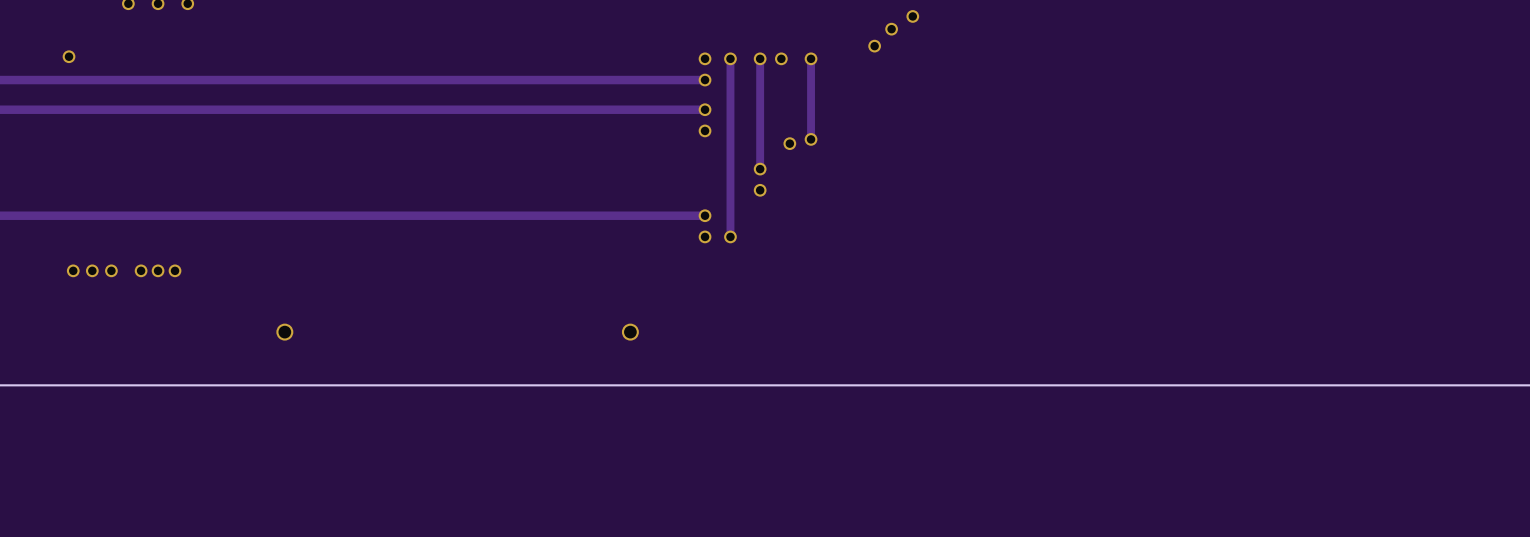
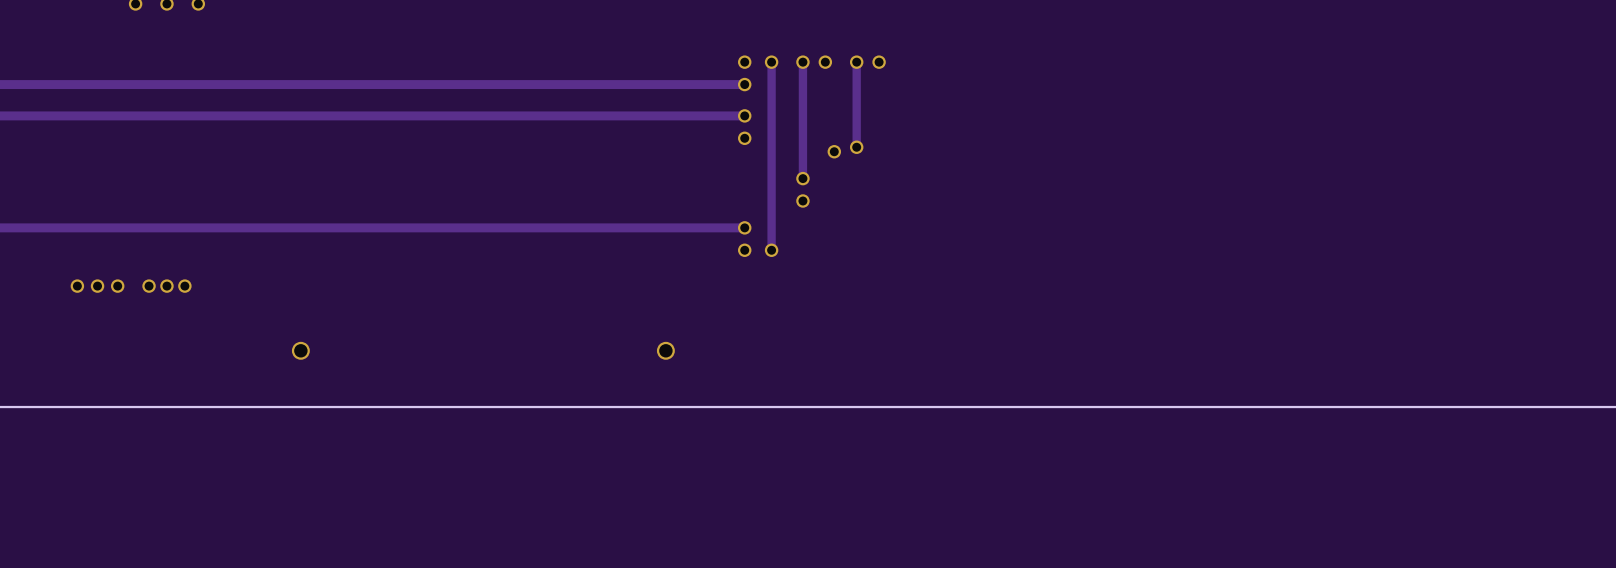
via: (912, 16) -> none
via: (891, 29) -> none
via: (874, 46) -> none
via: (69, 56) -> none
via: none -> (879, 62)

